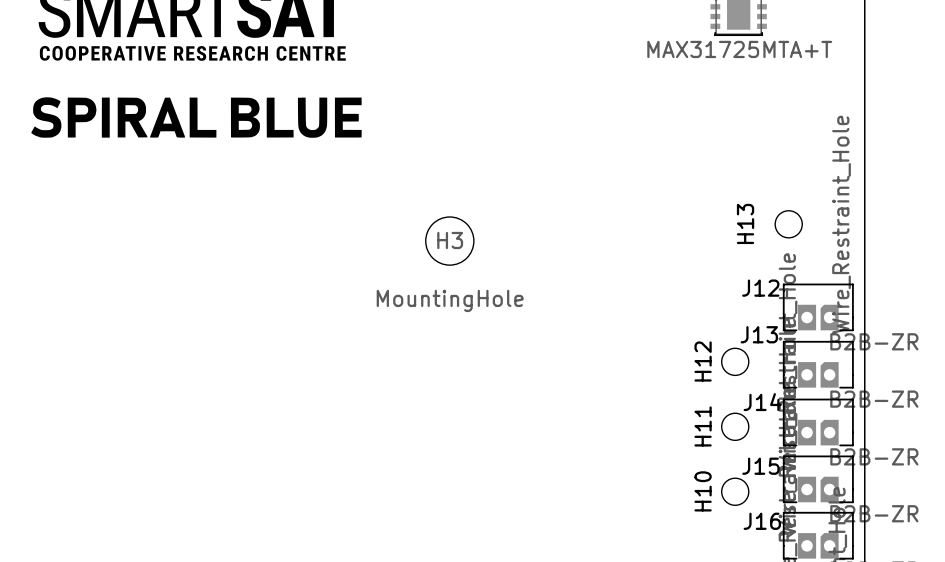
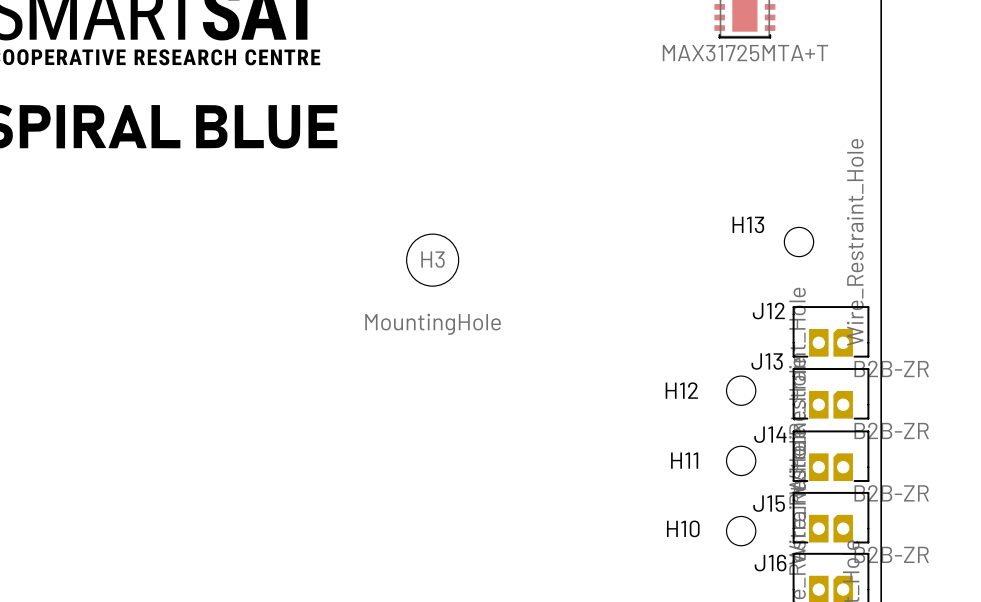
H13 name rotation: 0° (745, 223) -> 90° clockwise (748, 224)
H12 name rotation: 0° (703, 361) -> 90° clockwise (681, 390)
H11 name rotation: 0° (703, 426) -> 90° clockwise (684, 460)
H10 name rotation: 0° (703, 491) -> 90° clockwise (683, 528)

